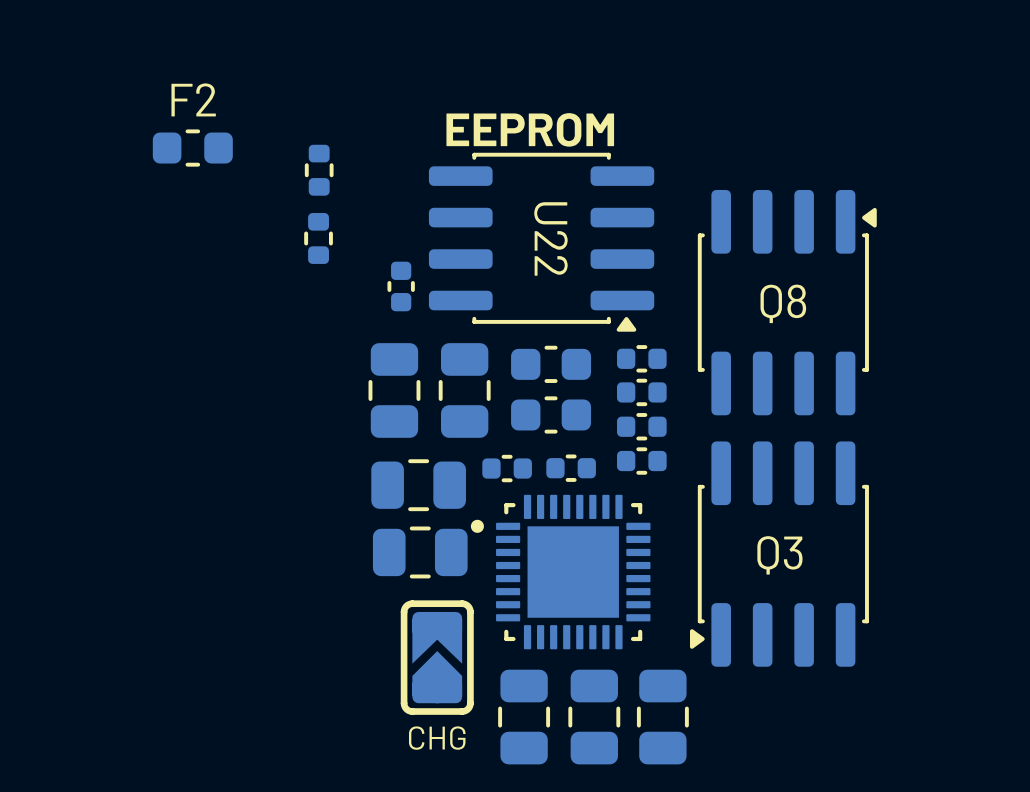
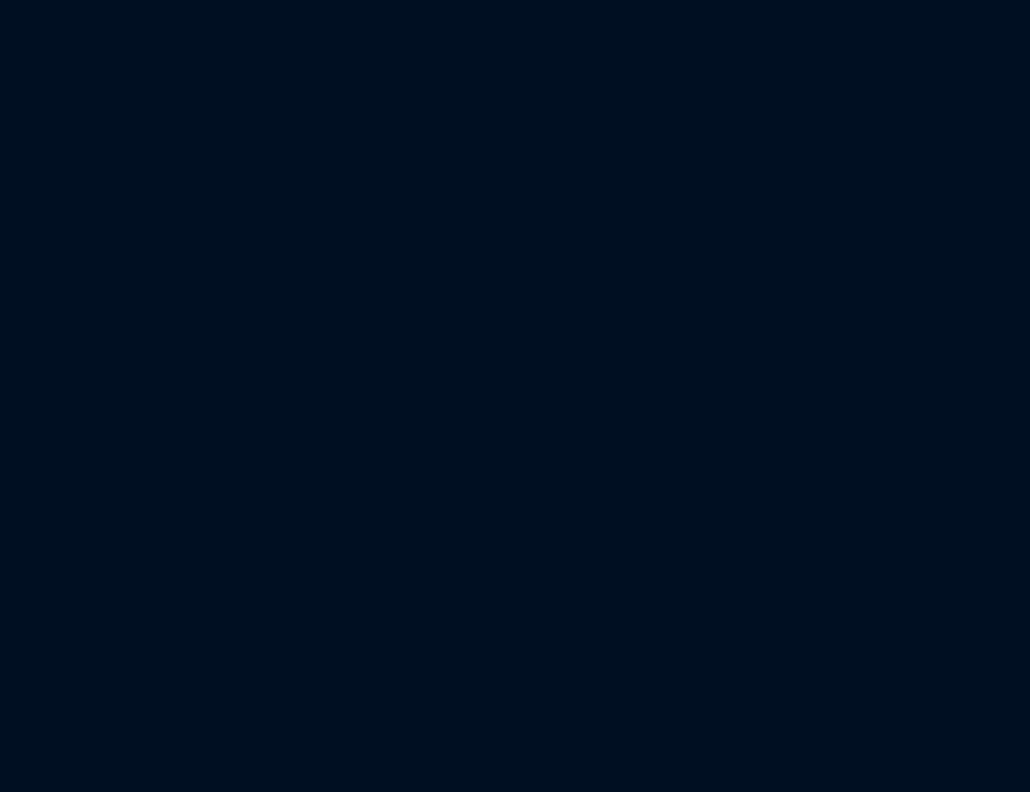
text: EEPROM (530, 129) -> none
F2: (192, 148) -> none
part: (319, 170) -> none
part: (318, 238) -> none
U22: (541, 242) -> none
part: (401, 286) -> none
Q8: (787, 302) -> none
part: (641, 358) -> none
part: (551, 364) -> none
part: (394, 390) -> none
part: (464, 390) -> none
part: (641, 392) -> none
part: (551, 414) -> none
part: (641, 426) -> none
part: (641, 461) -> none
part: (507, 468) -> none
part: (571, 468) -> none
part: (418, 485) -> none
part: (420, 552) -> none
Q3: (779, 554) -> none
part: (560, 572) -> none
part: (437, 657) -> none
part: (524, 717) -> none
part: (594, 717) -> none
part: (662, 717) -> none

